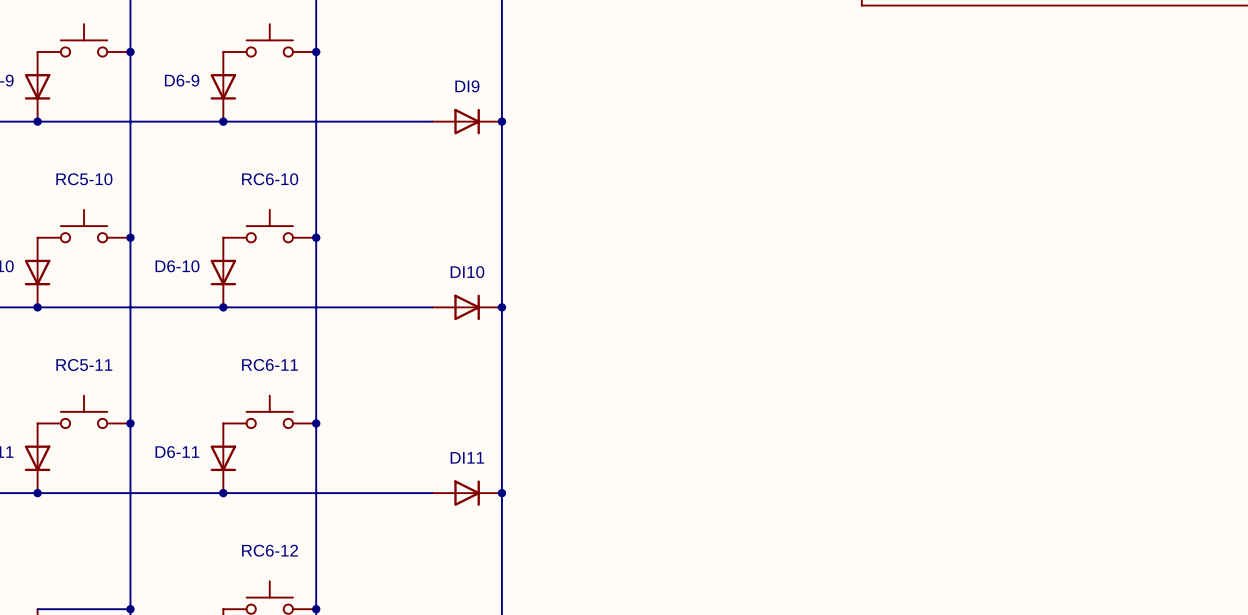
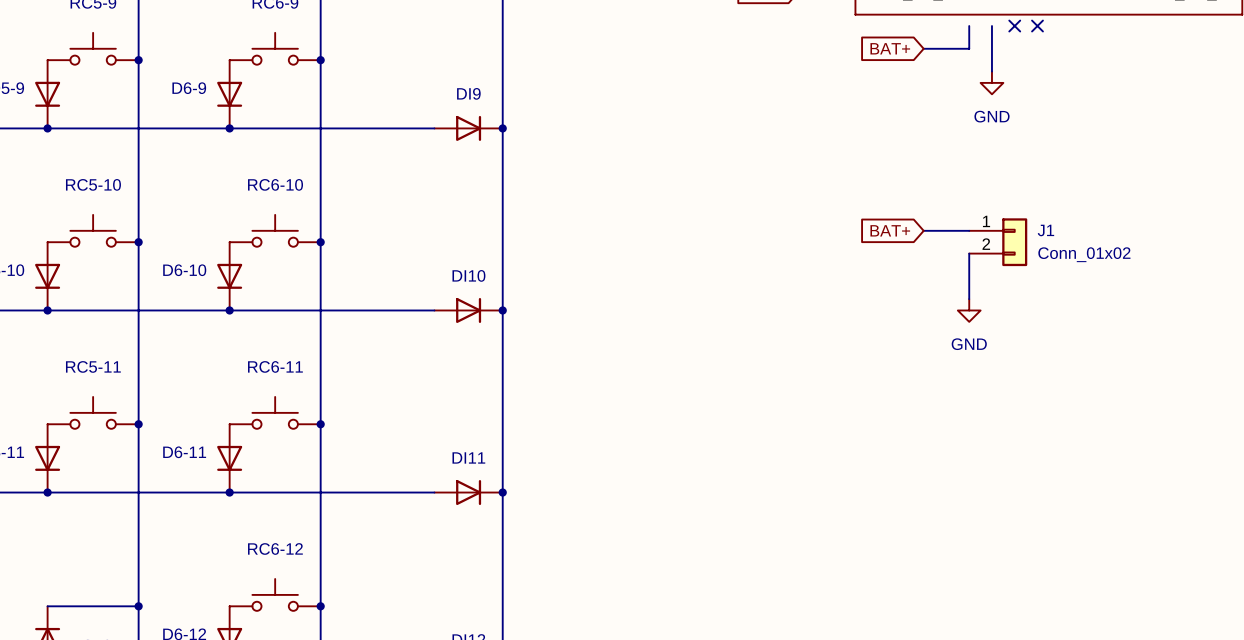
wire: none -> (969, 26) (969, 48) (923, 48)
wire: none -> (991, 26) (991, 71)
no-connect mark: none -> (1014, 26)
no-connect mark: none -> (1037, 26)
global label: none -> BAT+ (890, 48)
power symbol: none -> GND (991, 82)
global label: none -> BAT+ (890, 230)
wire: none -> (923, 230) (969, 230)
J1: none -> Conn_01x02 (998, 242)
wire: none -> (969, 253) (969, 299)
power symbol: none -> GND (969, 310)

